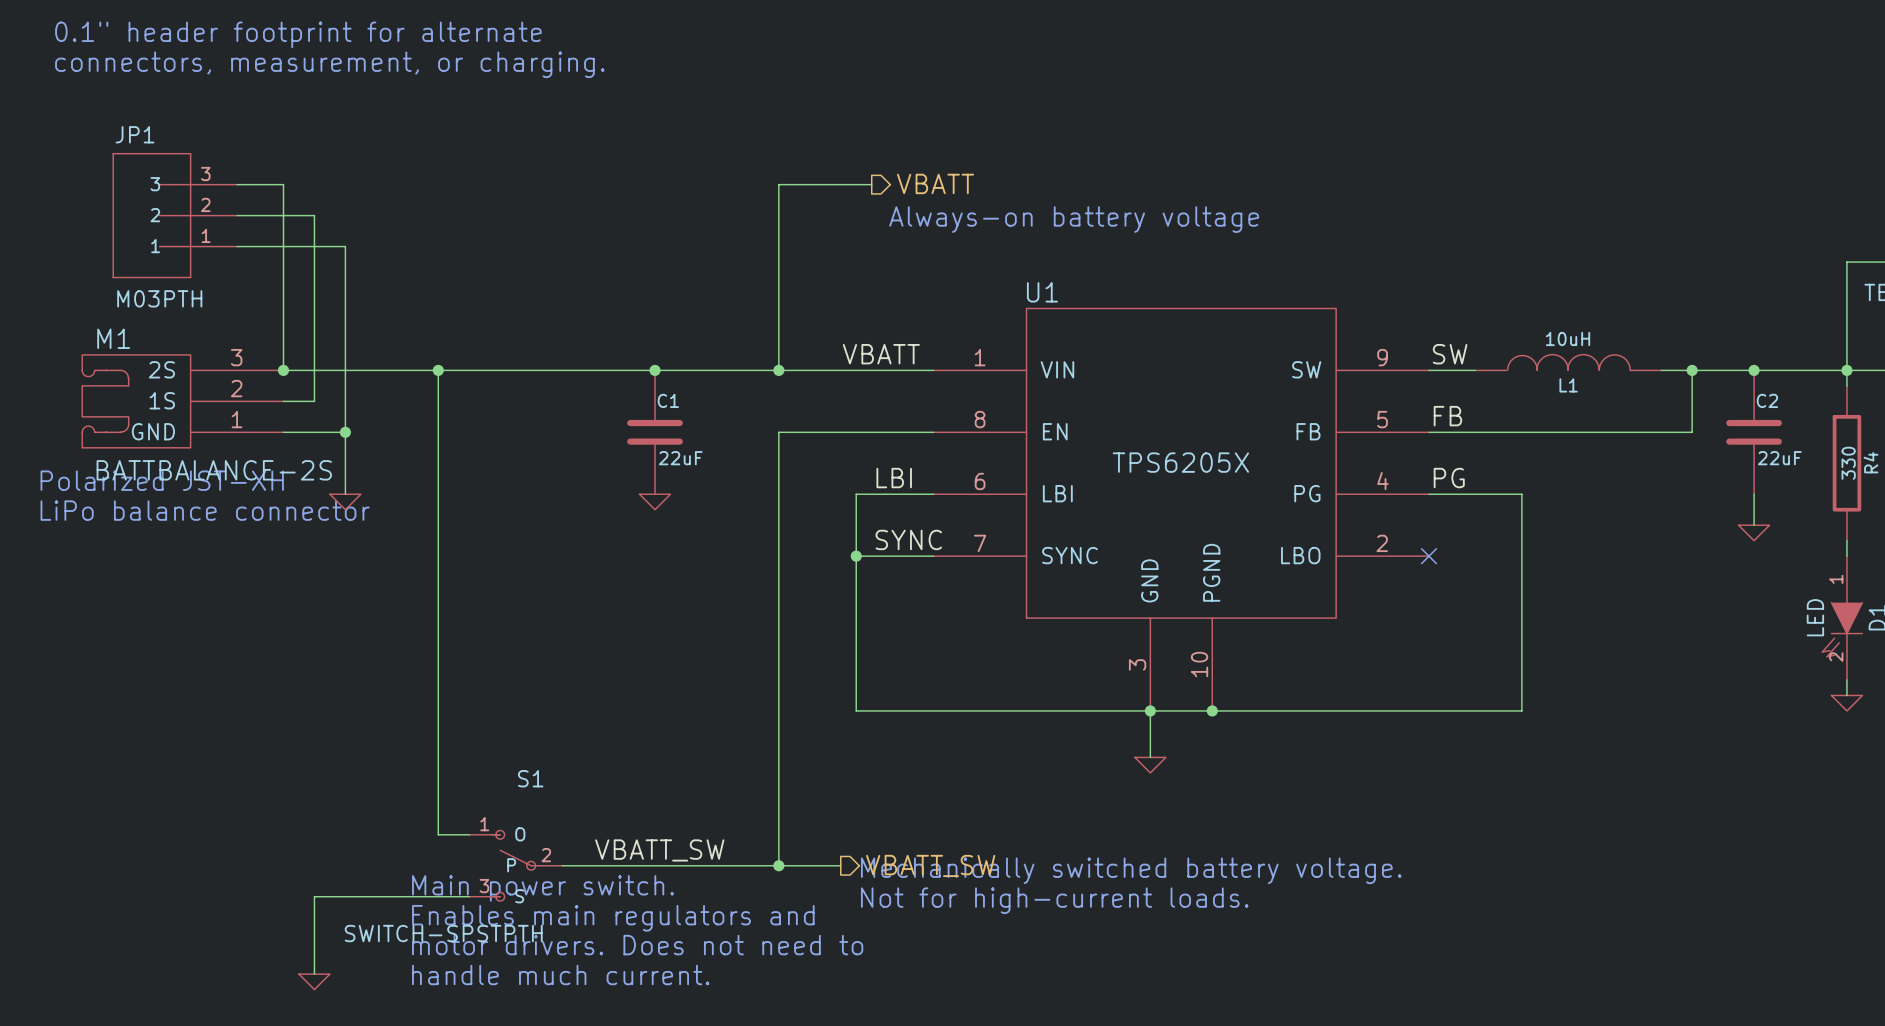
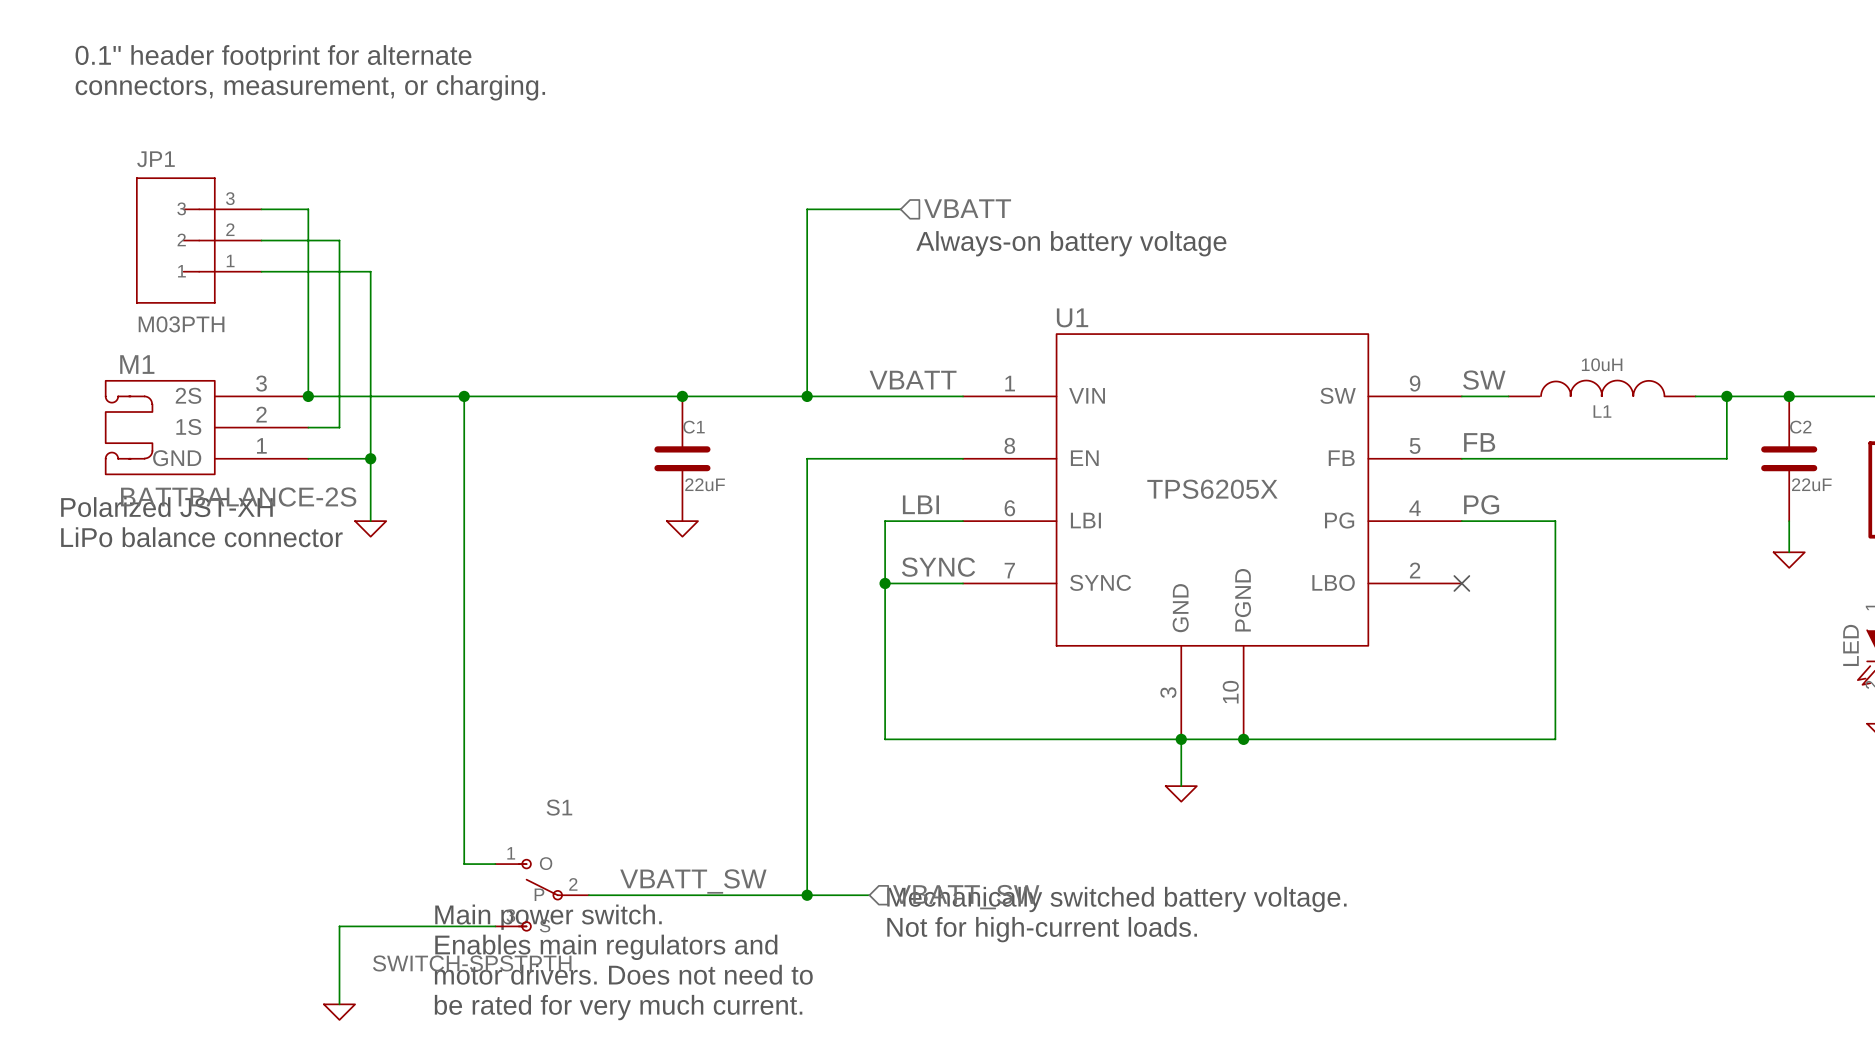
hierarchical label shape: output (935, 183) -> input (967, 208)
hierarchical label shape: output (930, 865) -> input (966, 897)
text: handle much current. (560, 974) -> be rated for very much current. (618, 1007)

